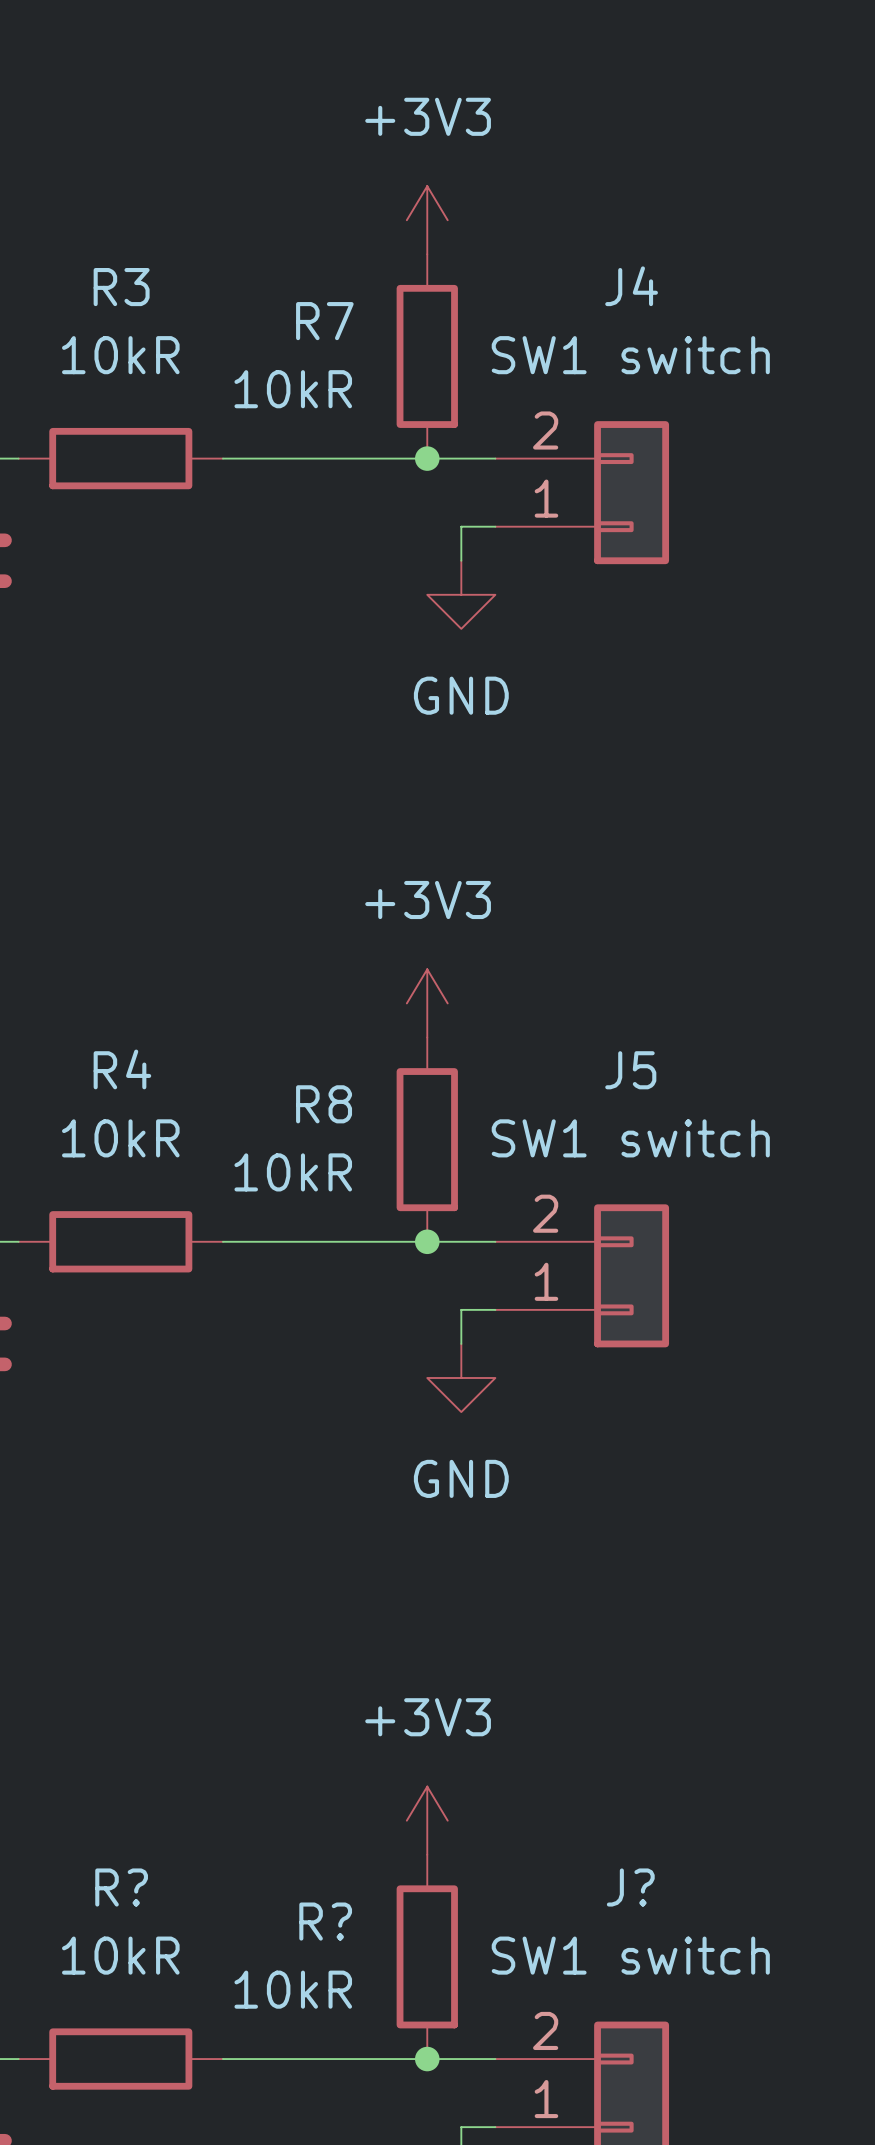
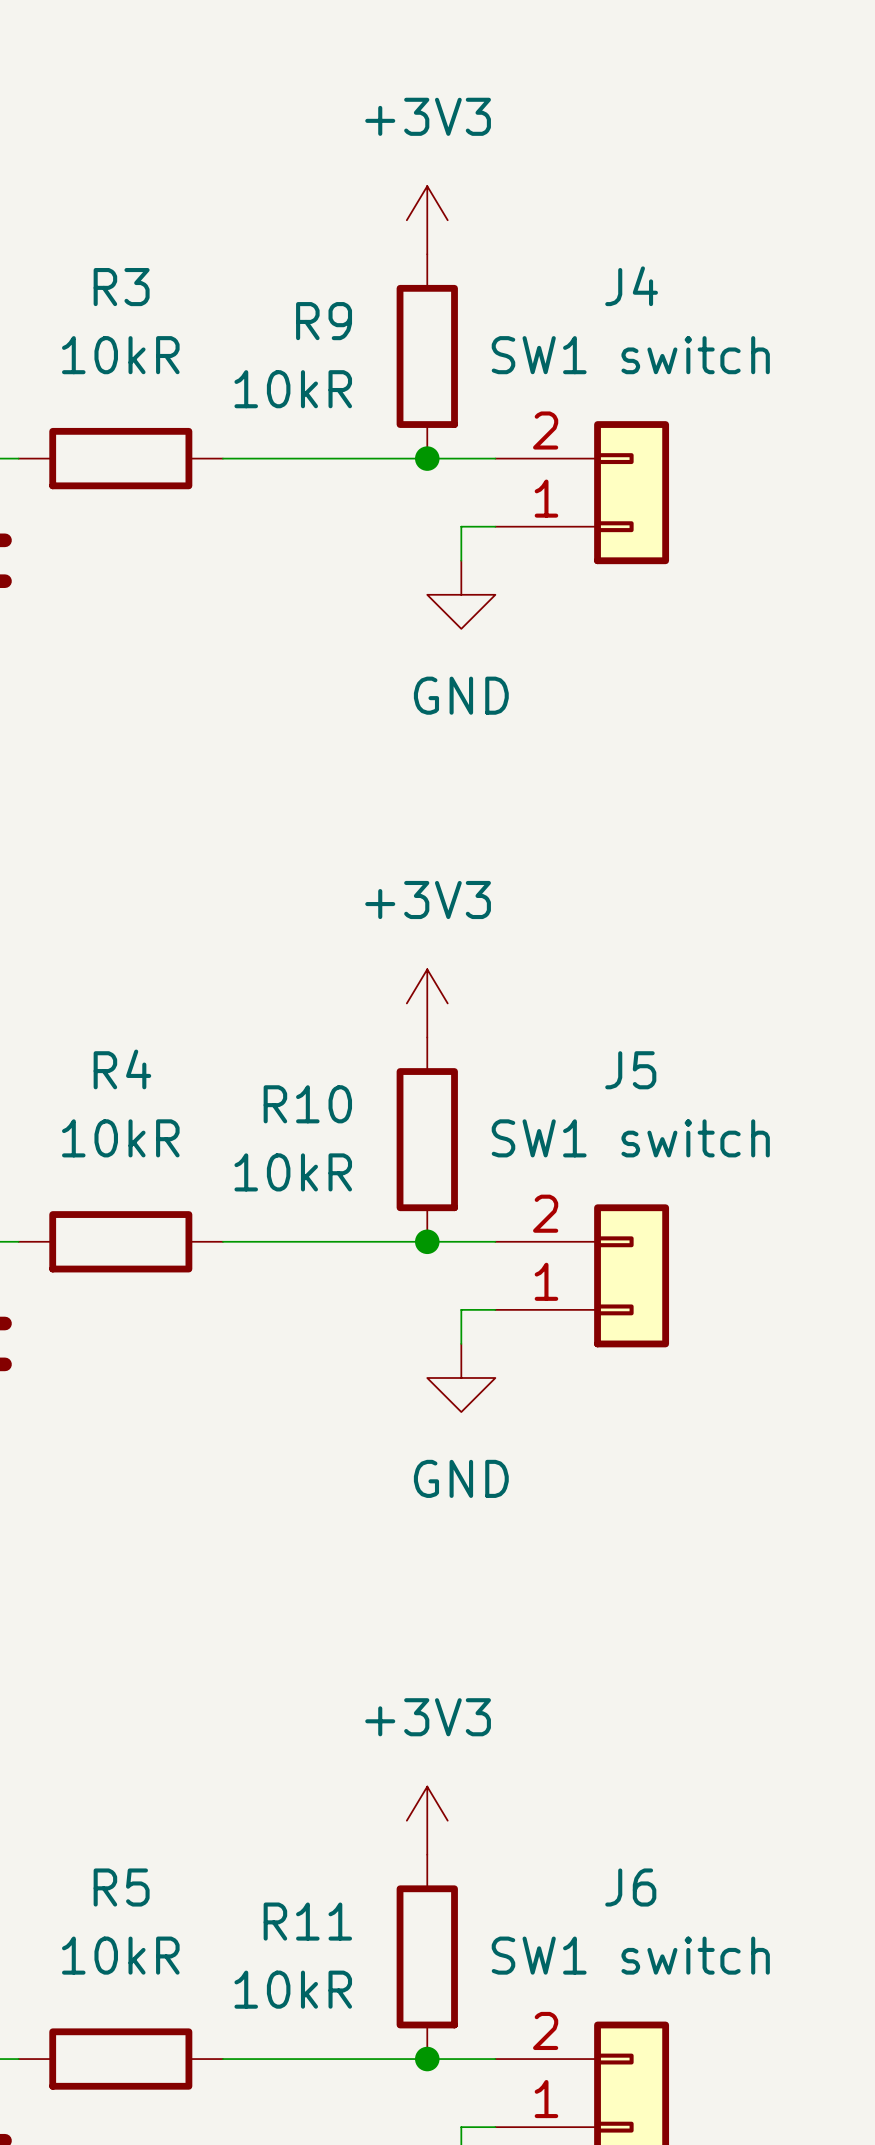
R7 name: R7 (324, 321) -> R9 (324, 321)
R8 name: R8 (324, 1104) -> R10 (307, 1104)
R? name: R? (121, 1887) -> R5 (121, 1887)
J? name: J? (630, 1887) -> J6 (630, 1887)
R? name: R? (325, 1921) -> R11 (307, 1921)

